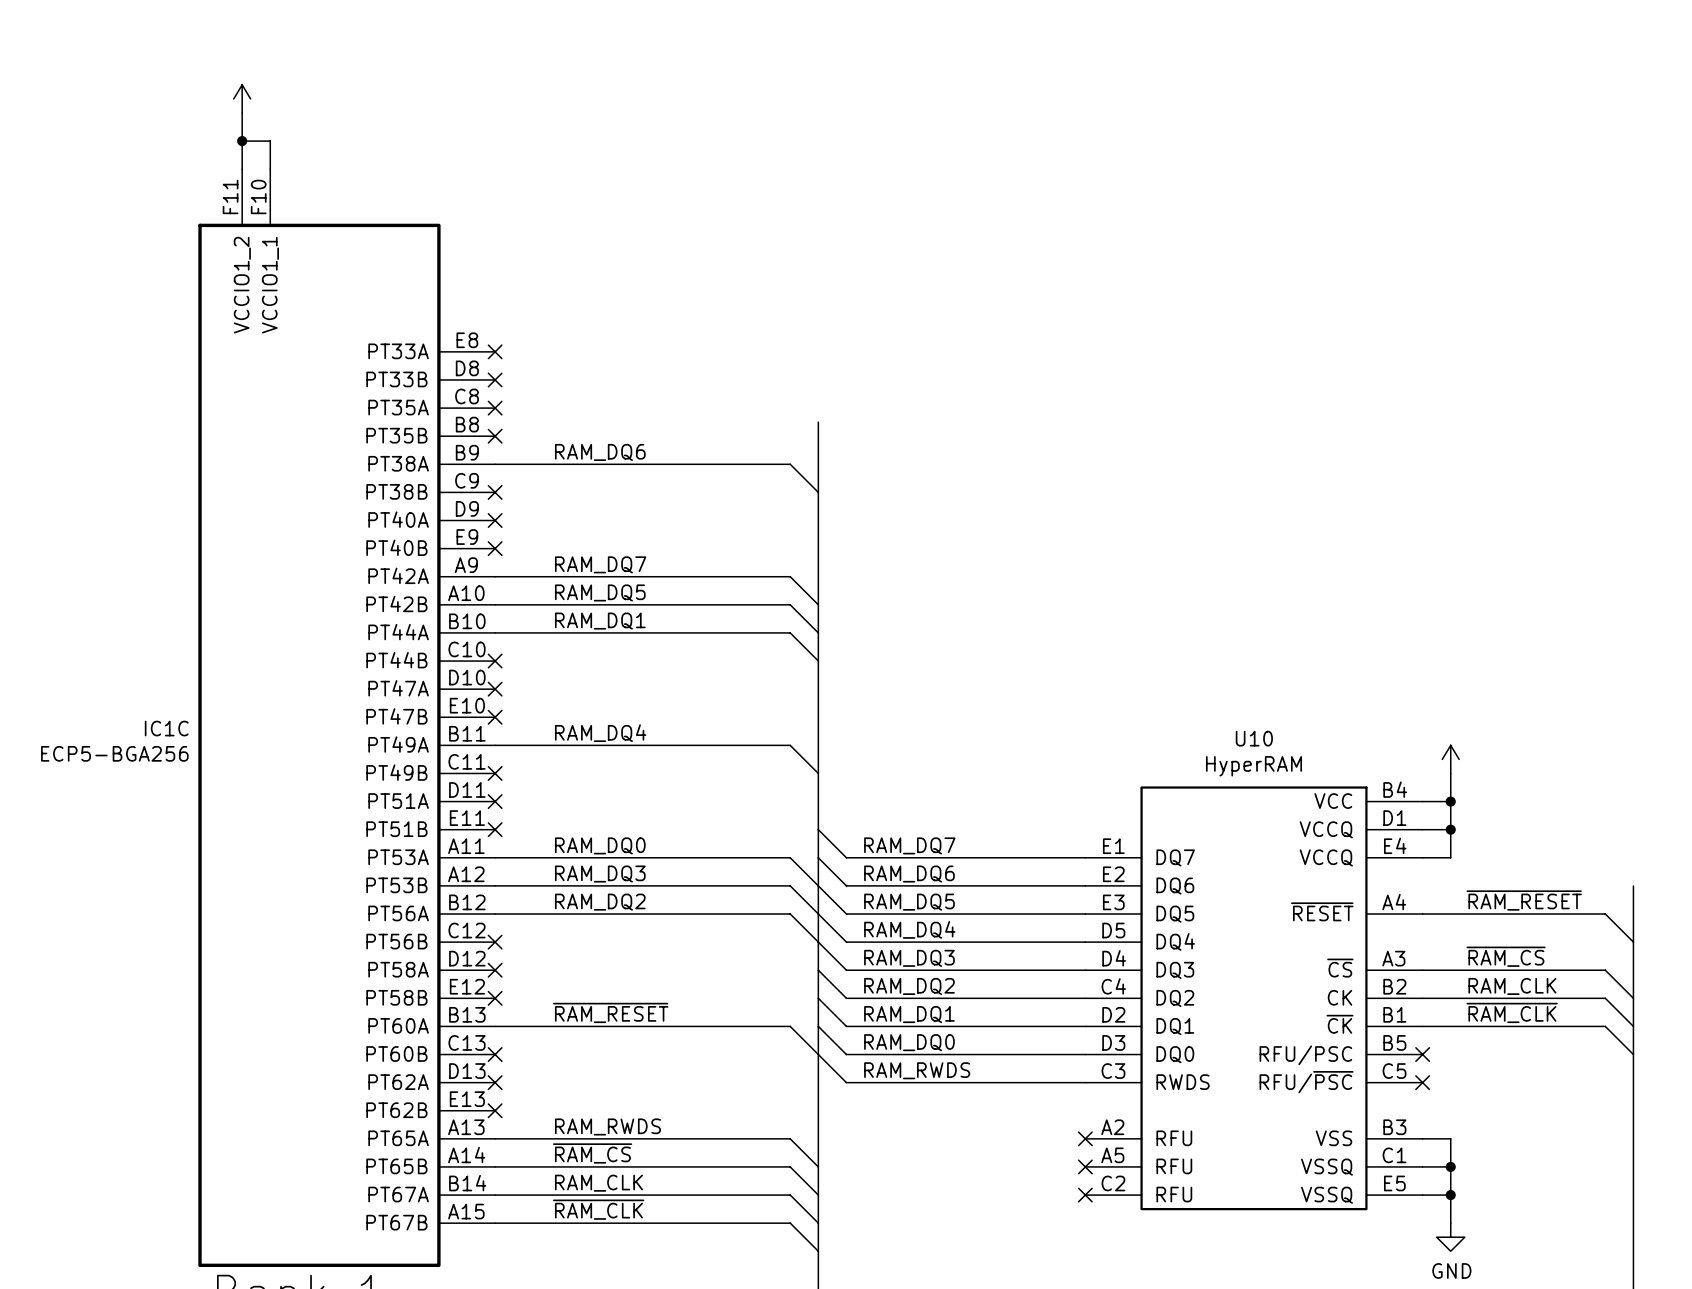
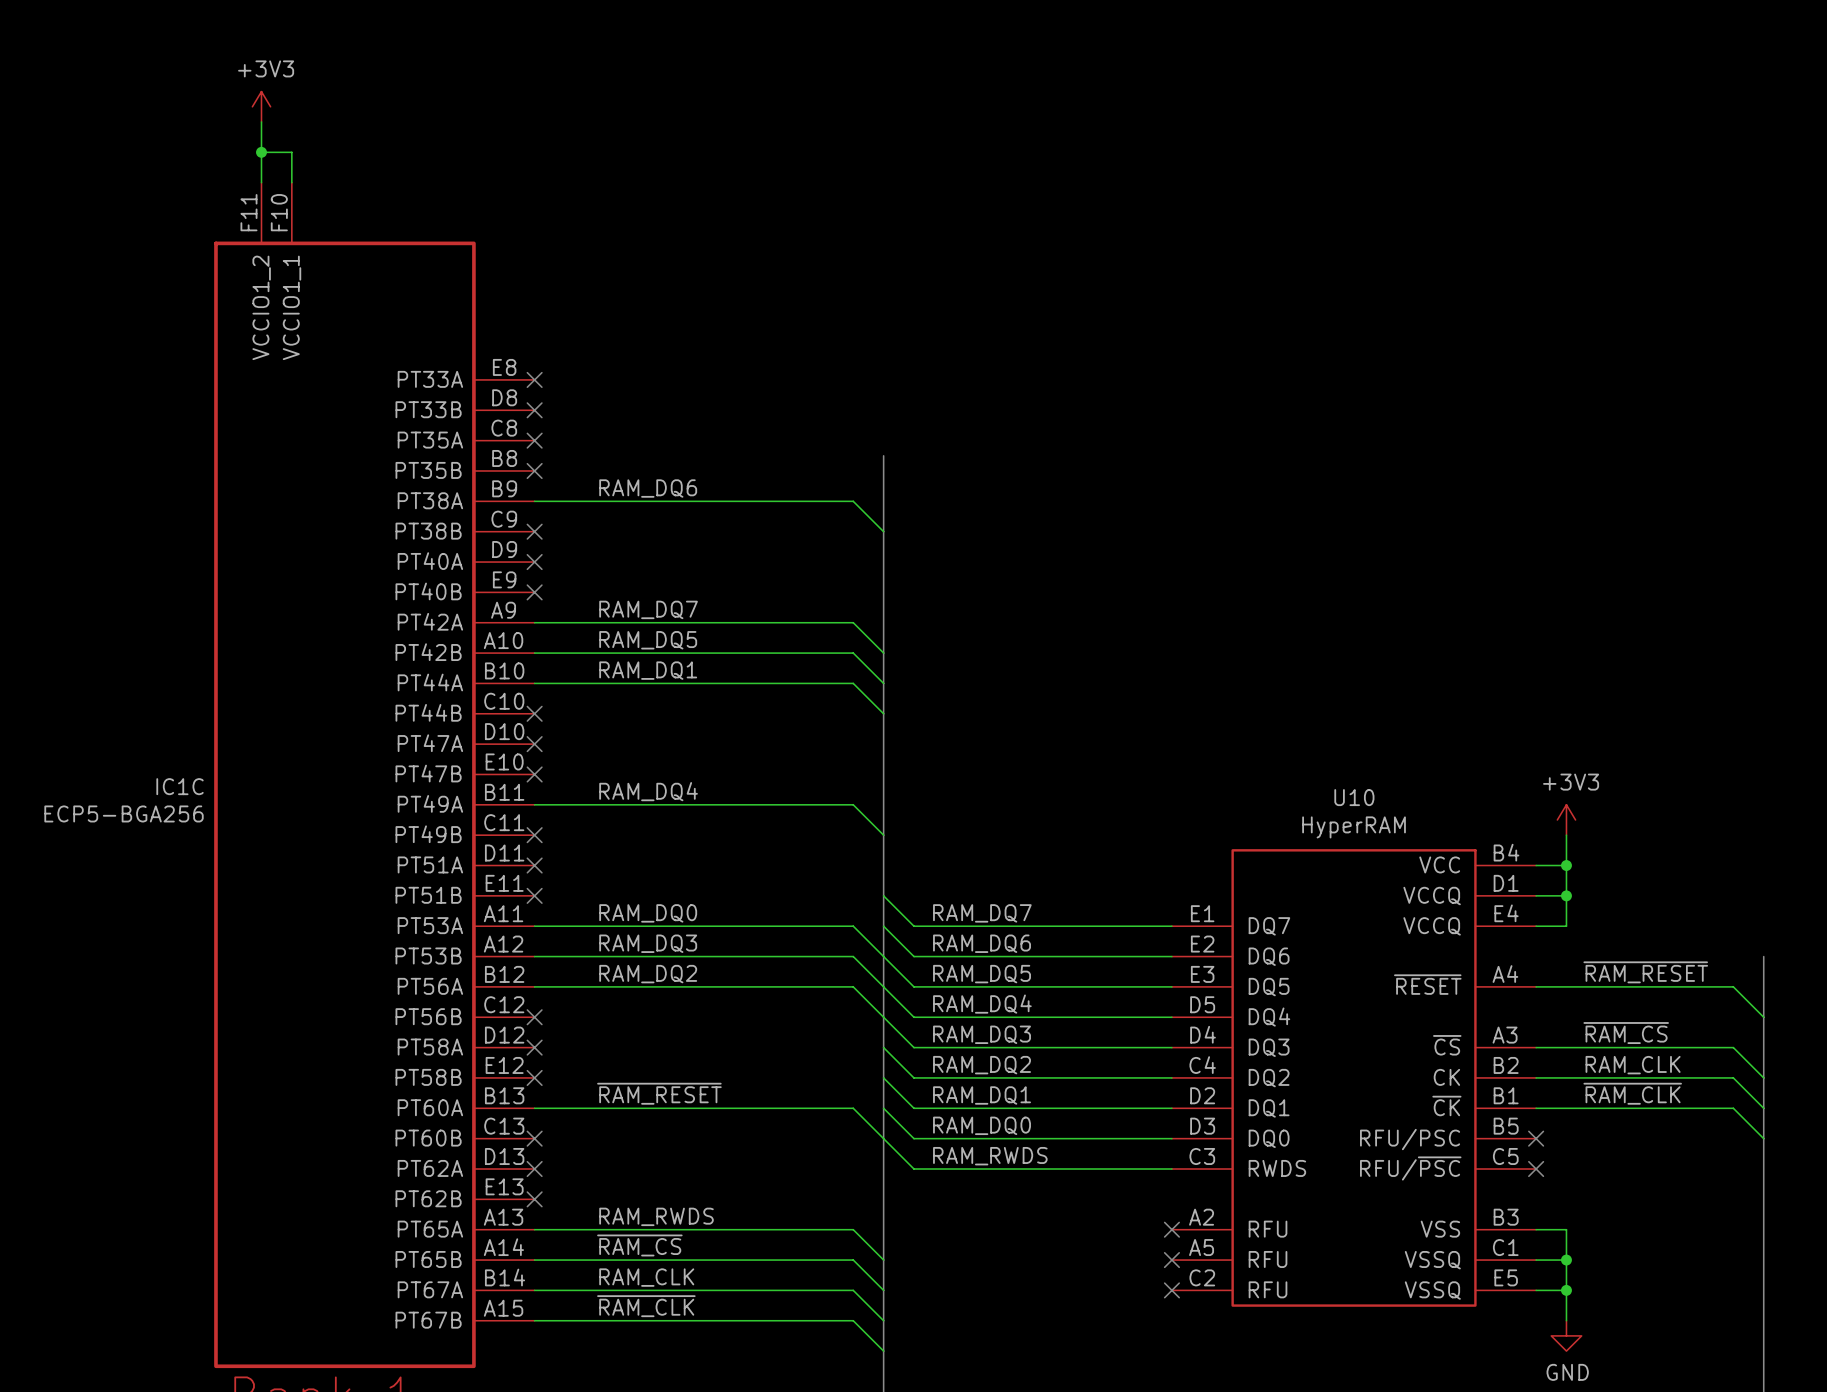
power symbol text: none -> +3V3 (266, 68)
power symbol text: none -> +3V3 (1571, 782)

